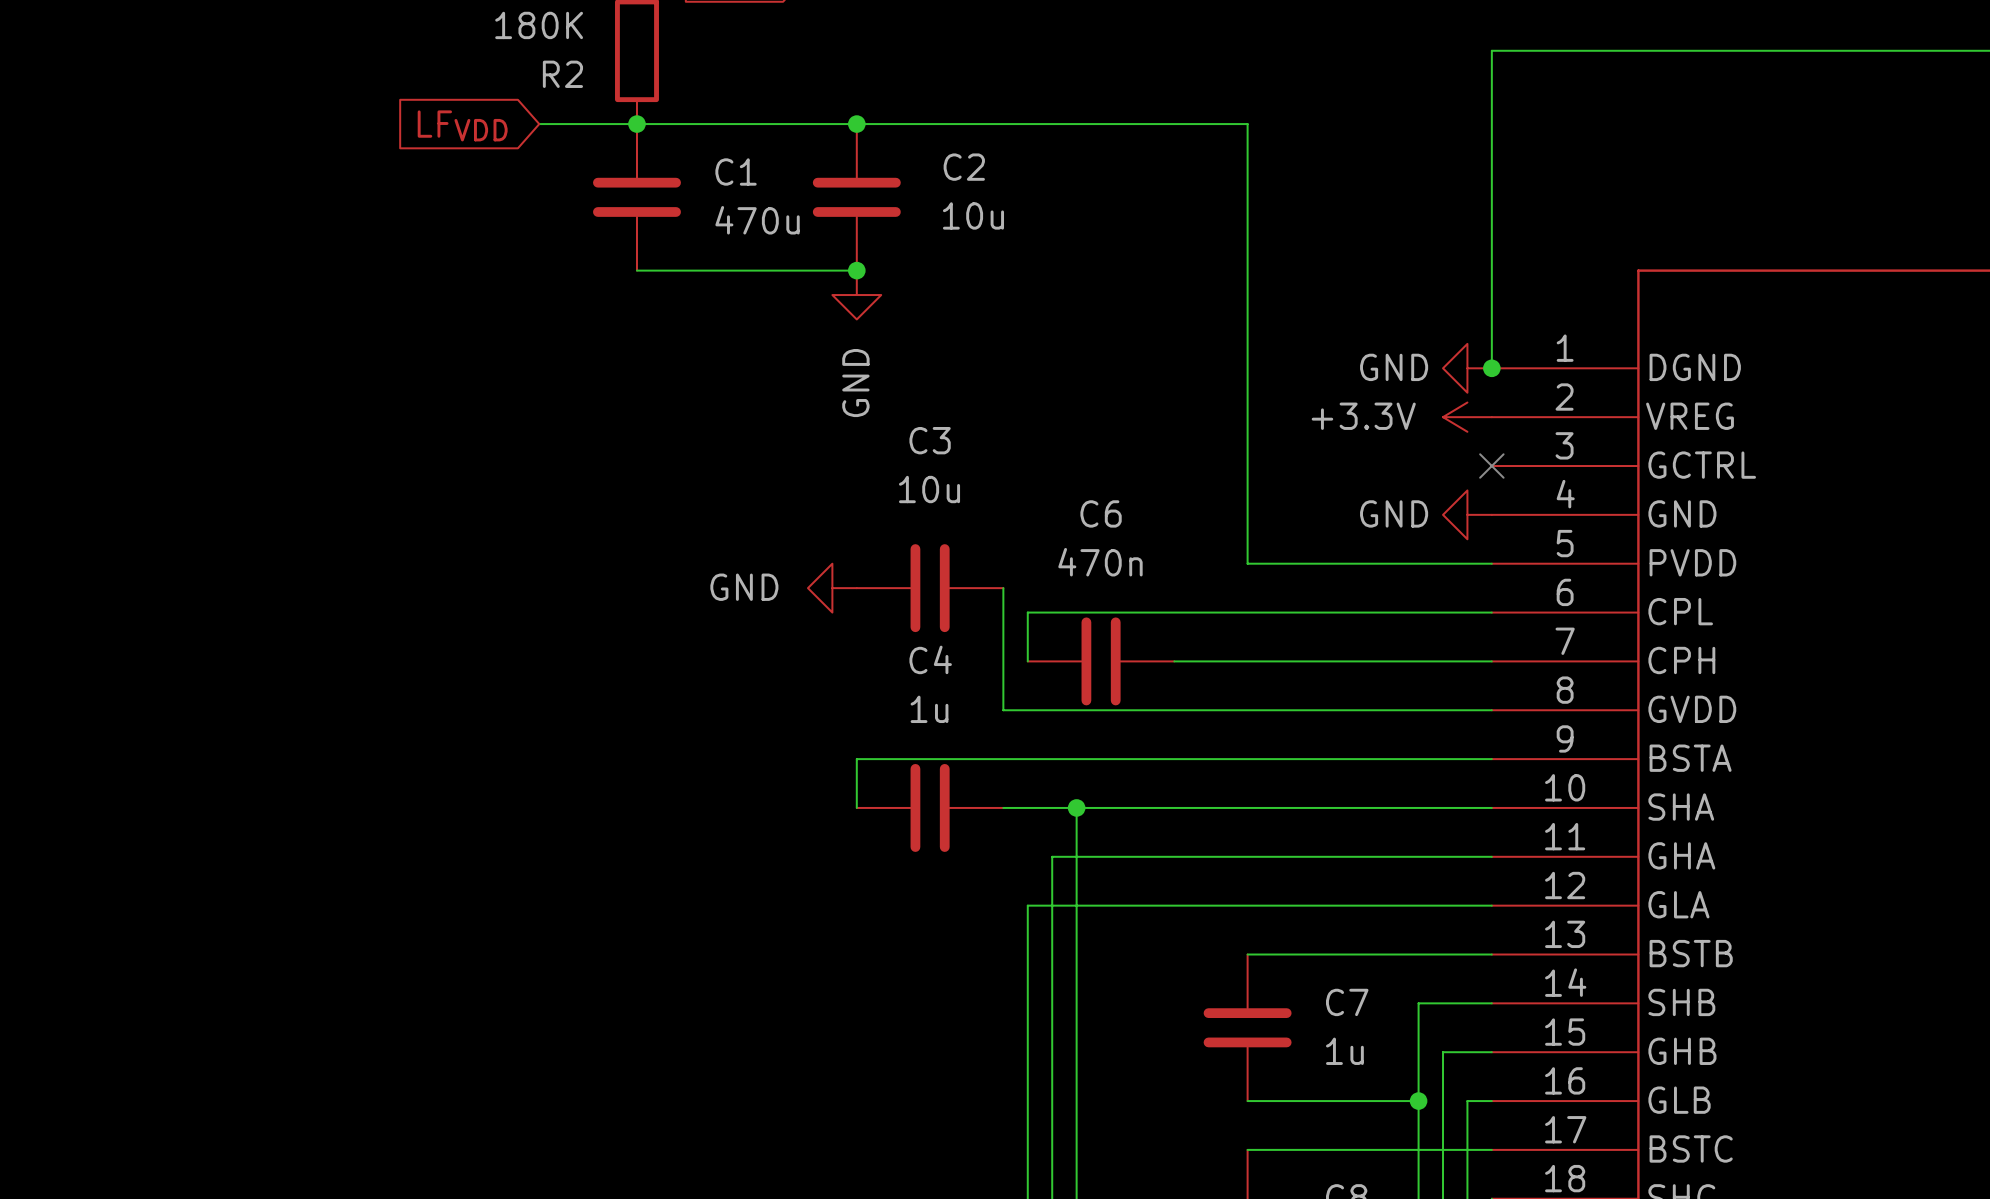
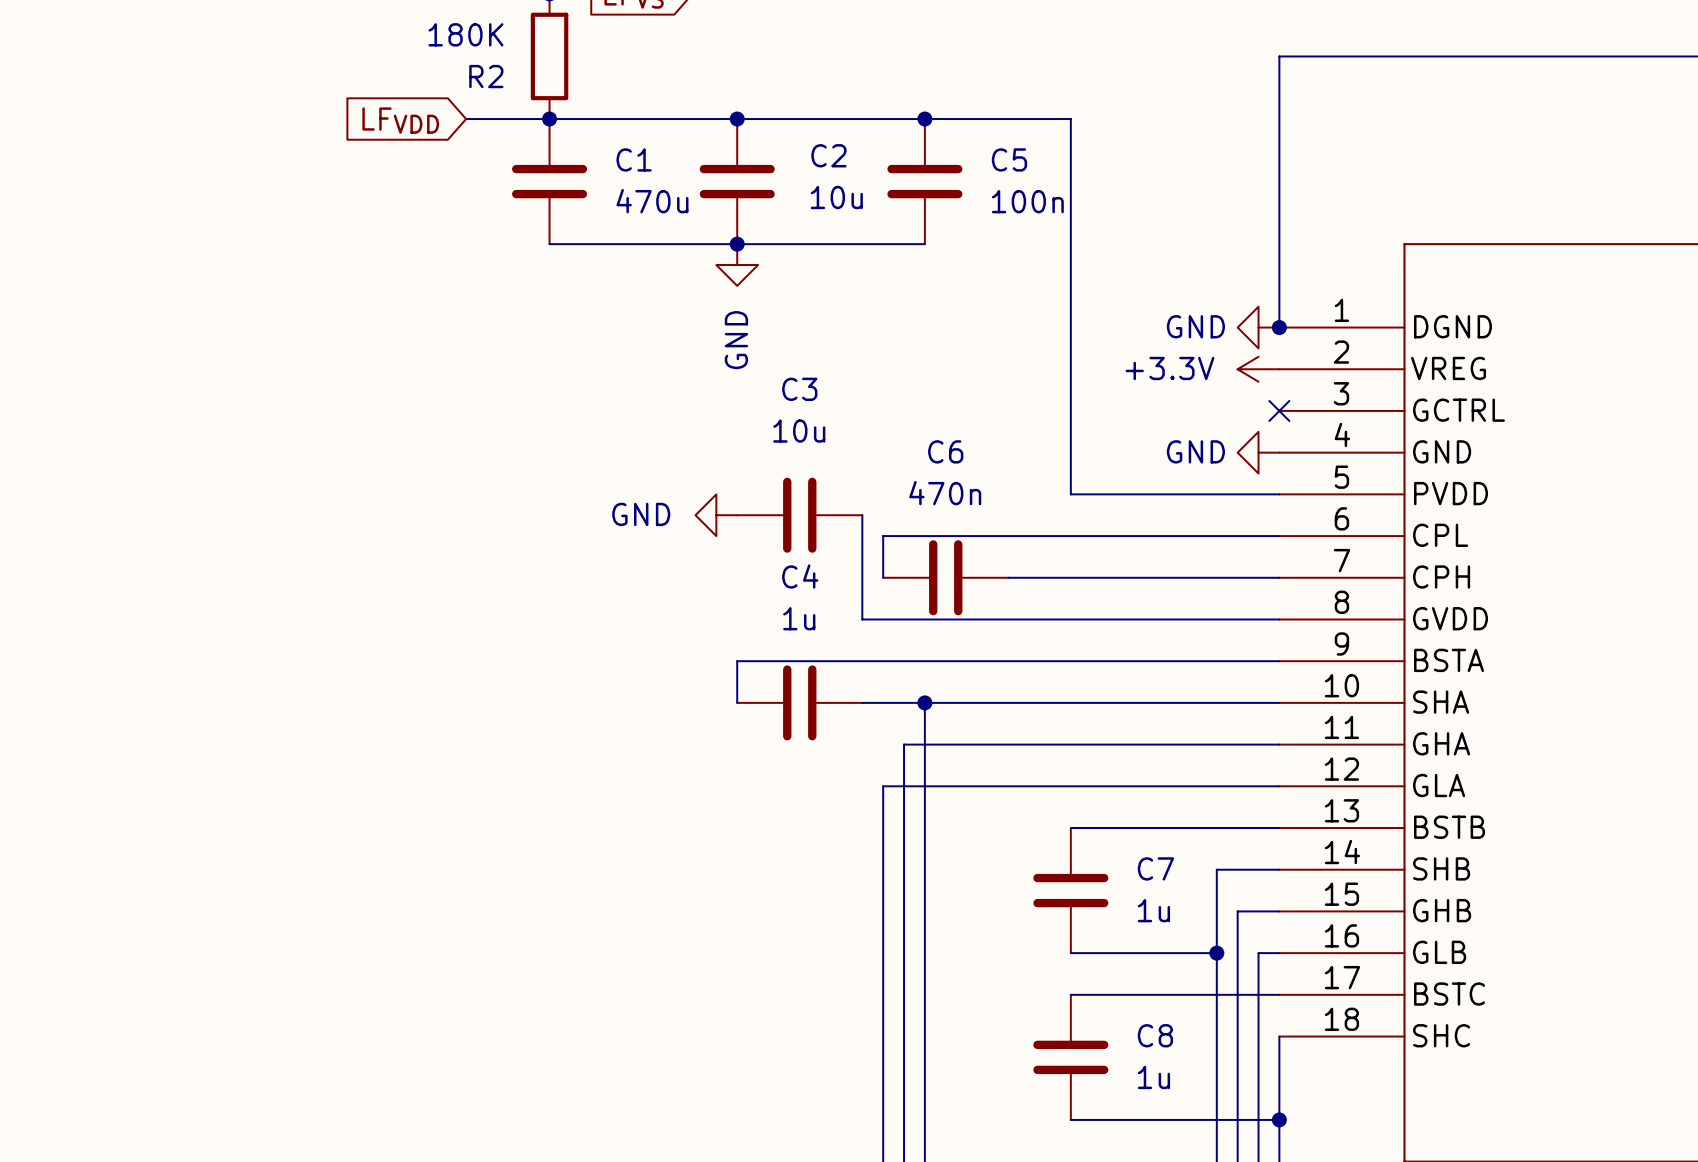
junction: none -> (924, 119)
C5: none -> 100n (924, 181)
wire: none -> (737, 244) (924, 244)

